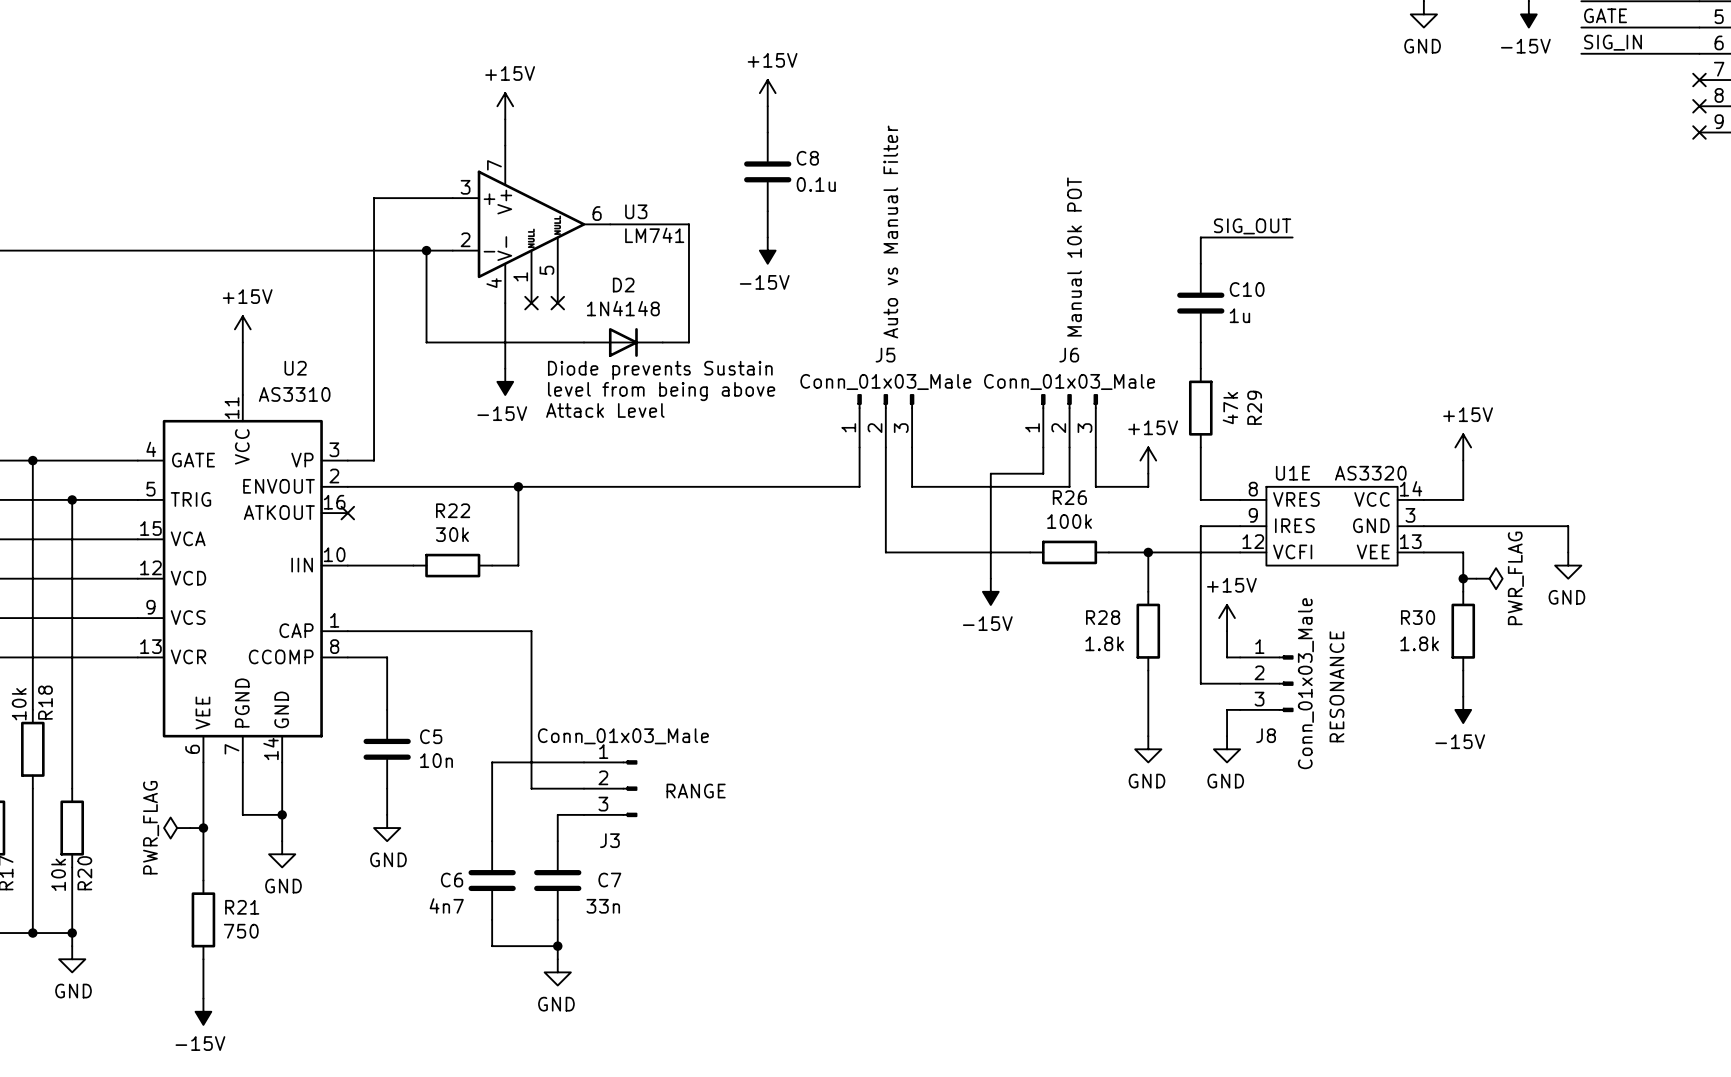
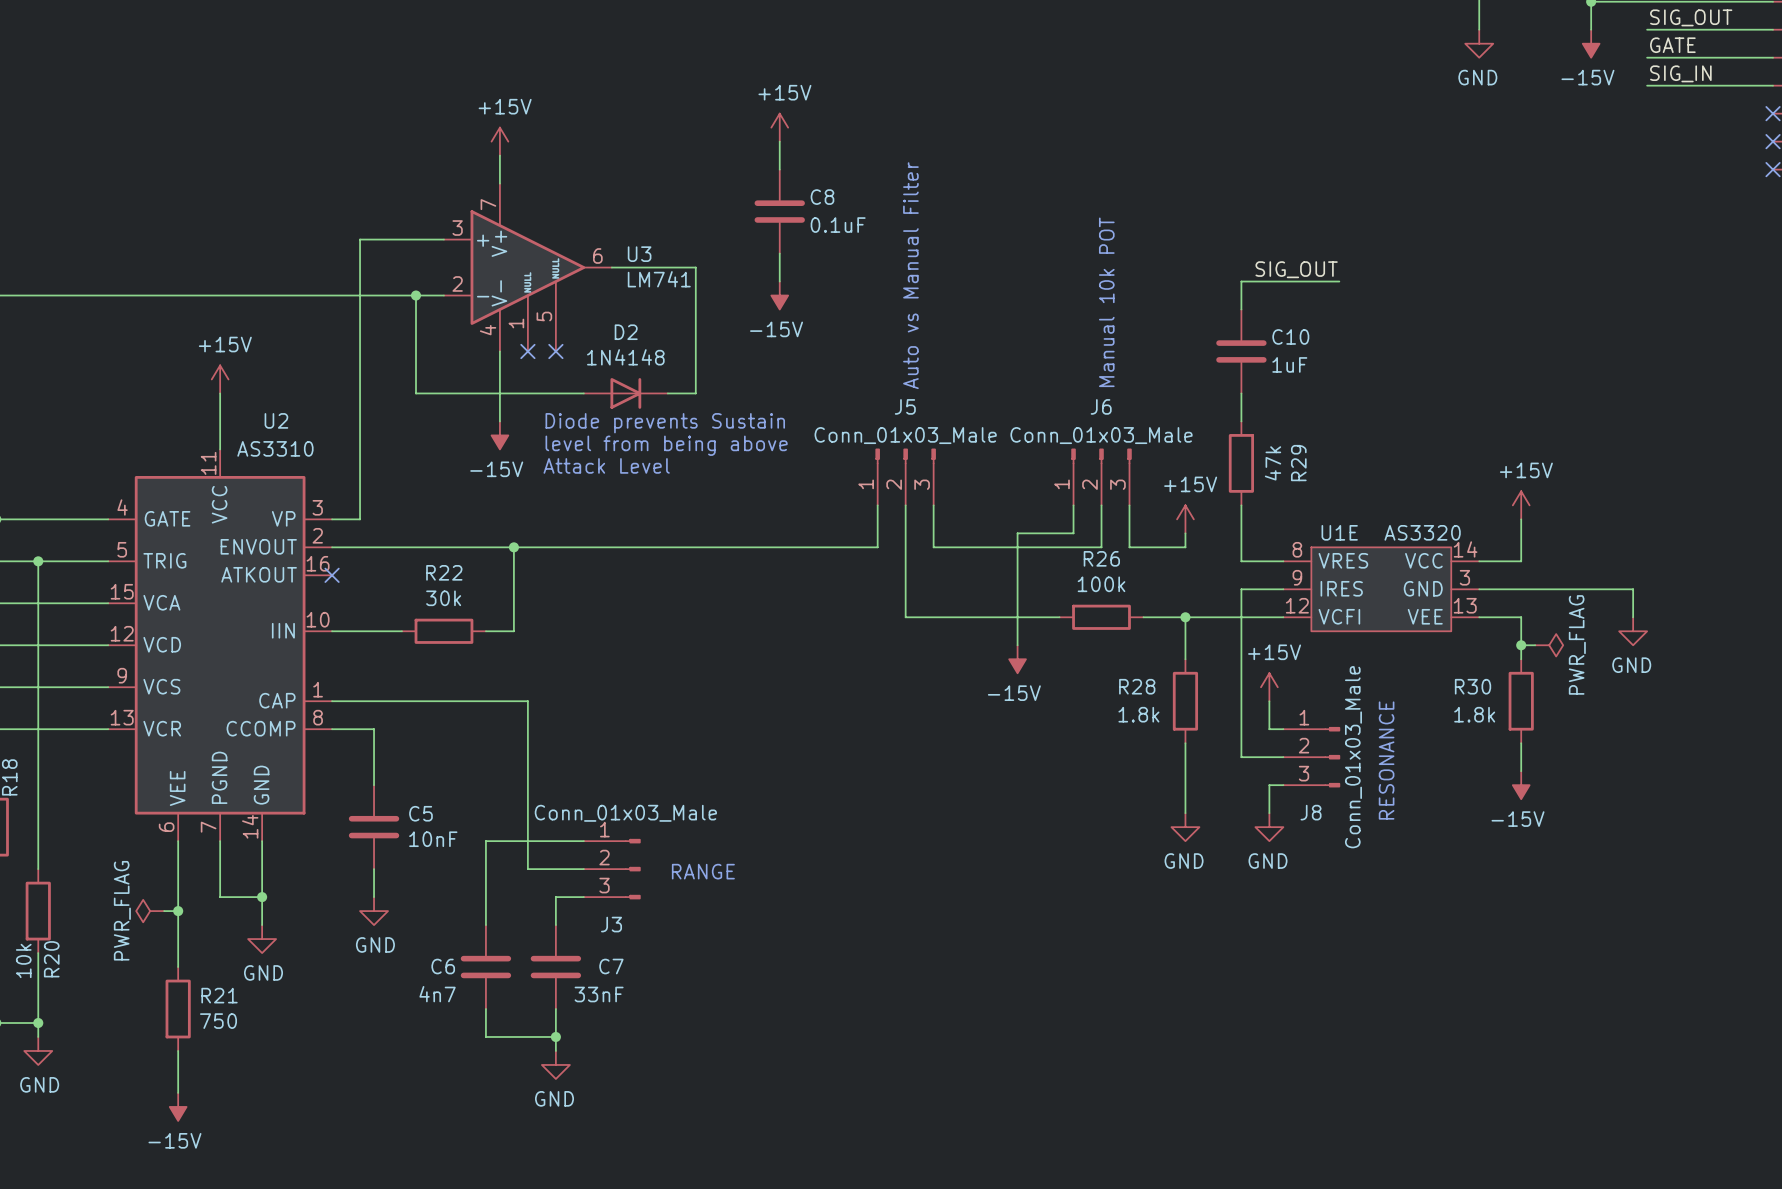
C8 value: 0.1u (816, 184) -> 0.1uF (838, 225)
C10 value: 1u (1239, 315) -> 1uF (1289, 364)
C5 value: 10n (436, 760) -> 10nF (433, 839)
C7 value: 33n (603, 906) -> 33nF (599, 994)

